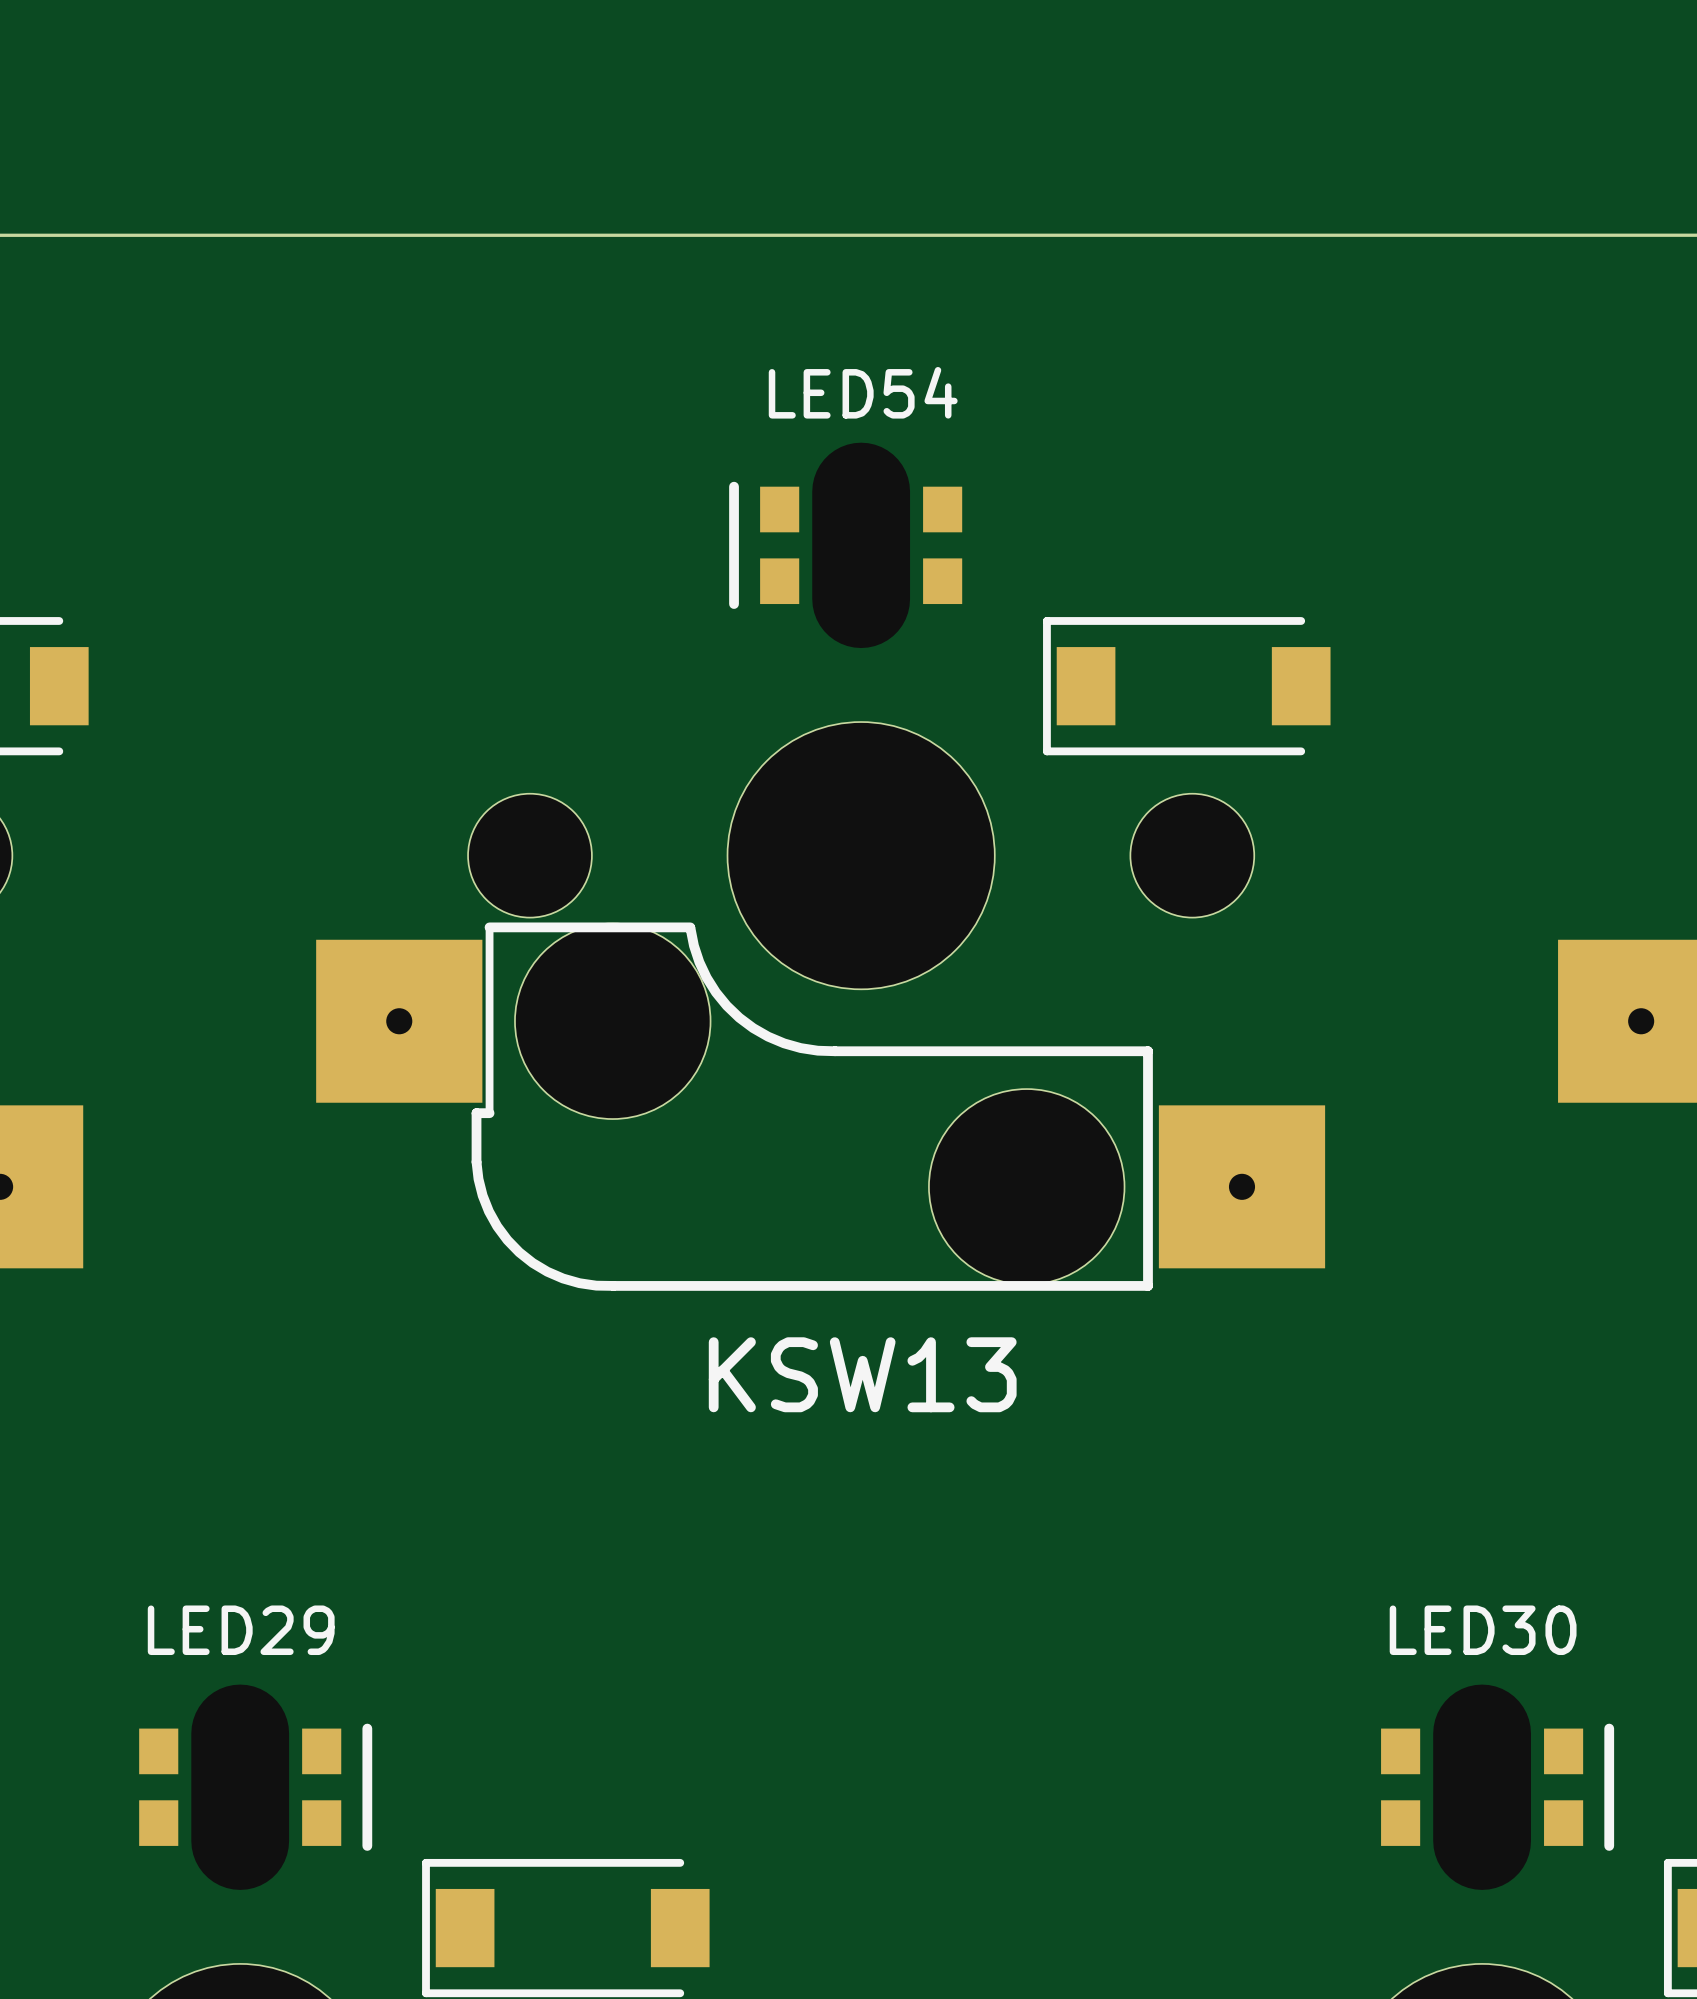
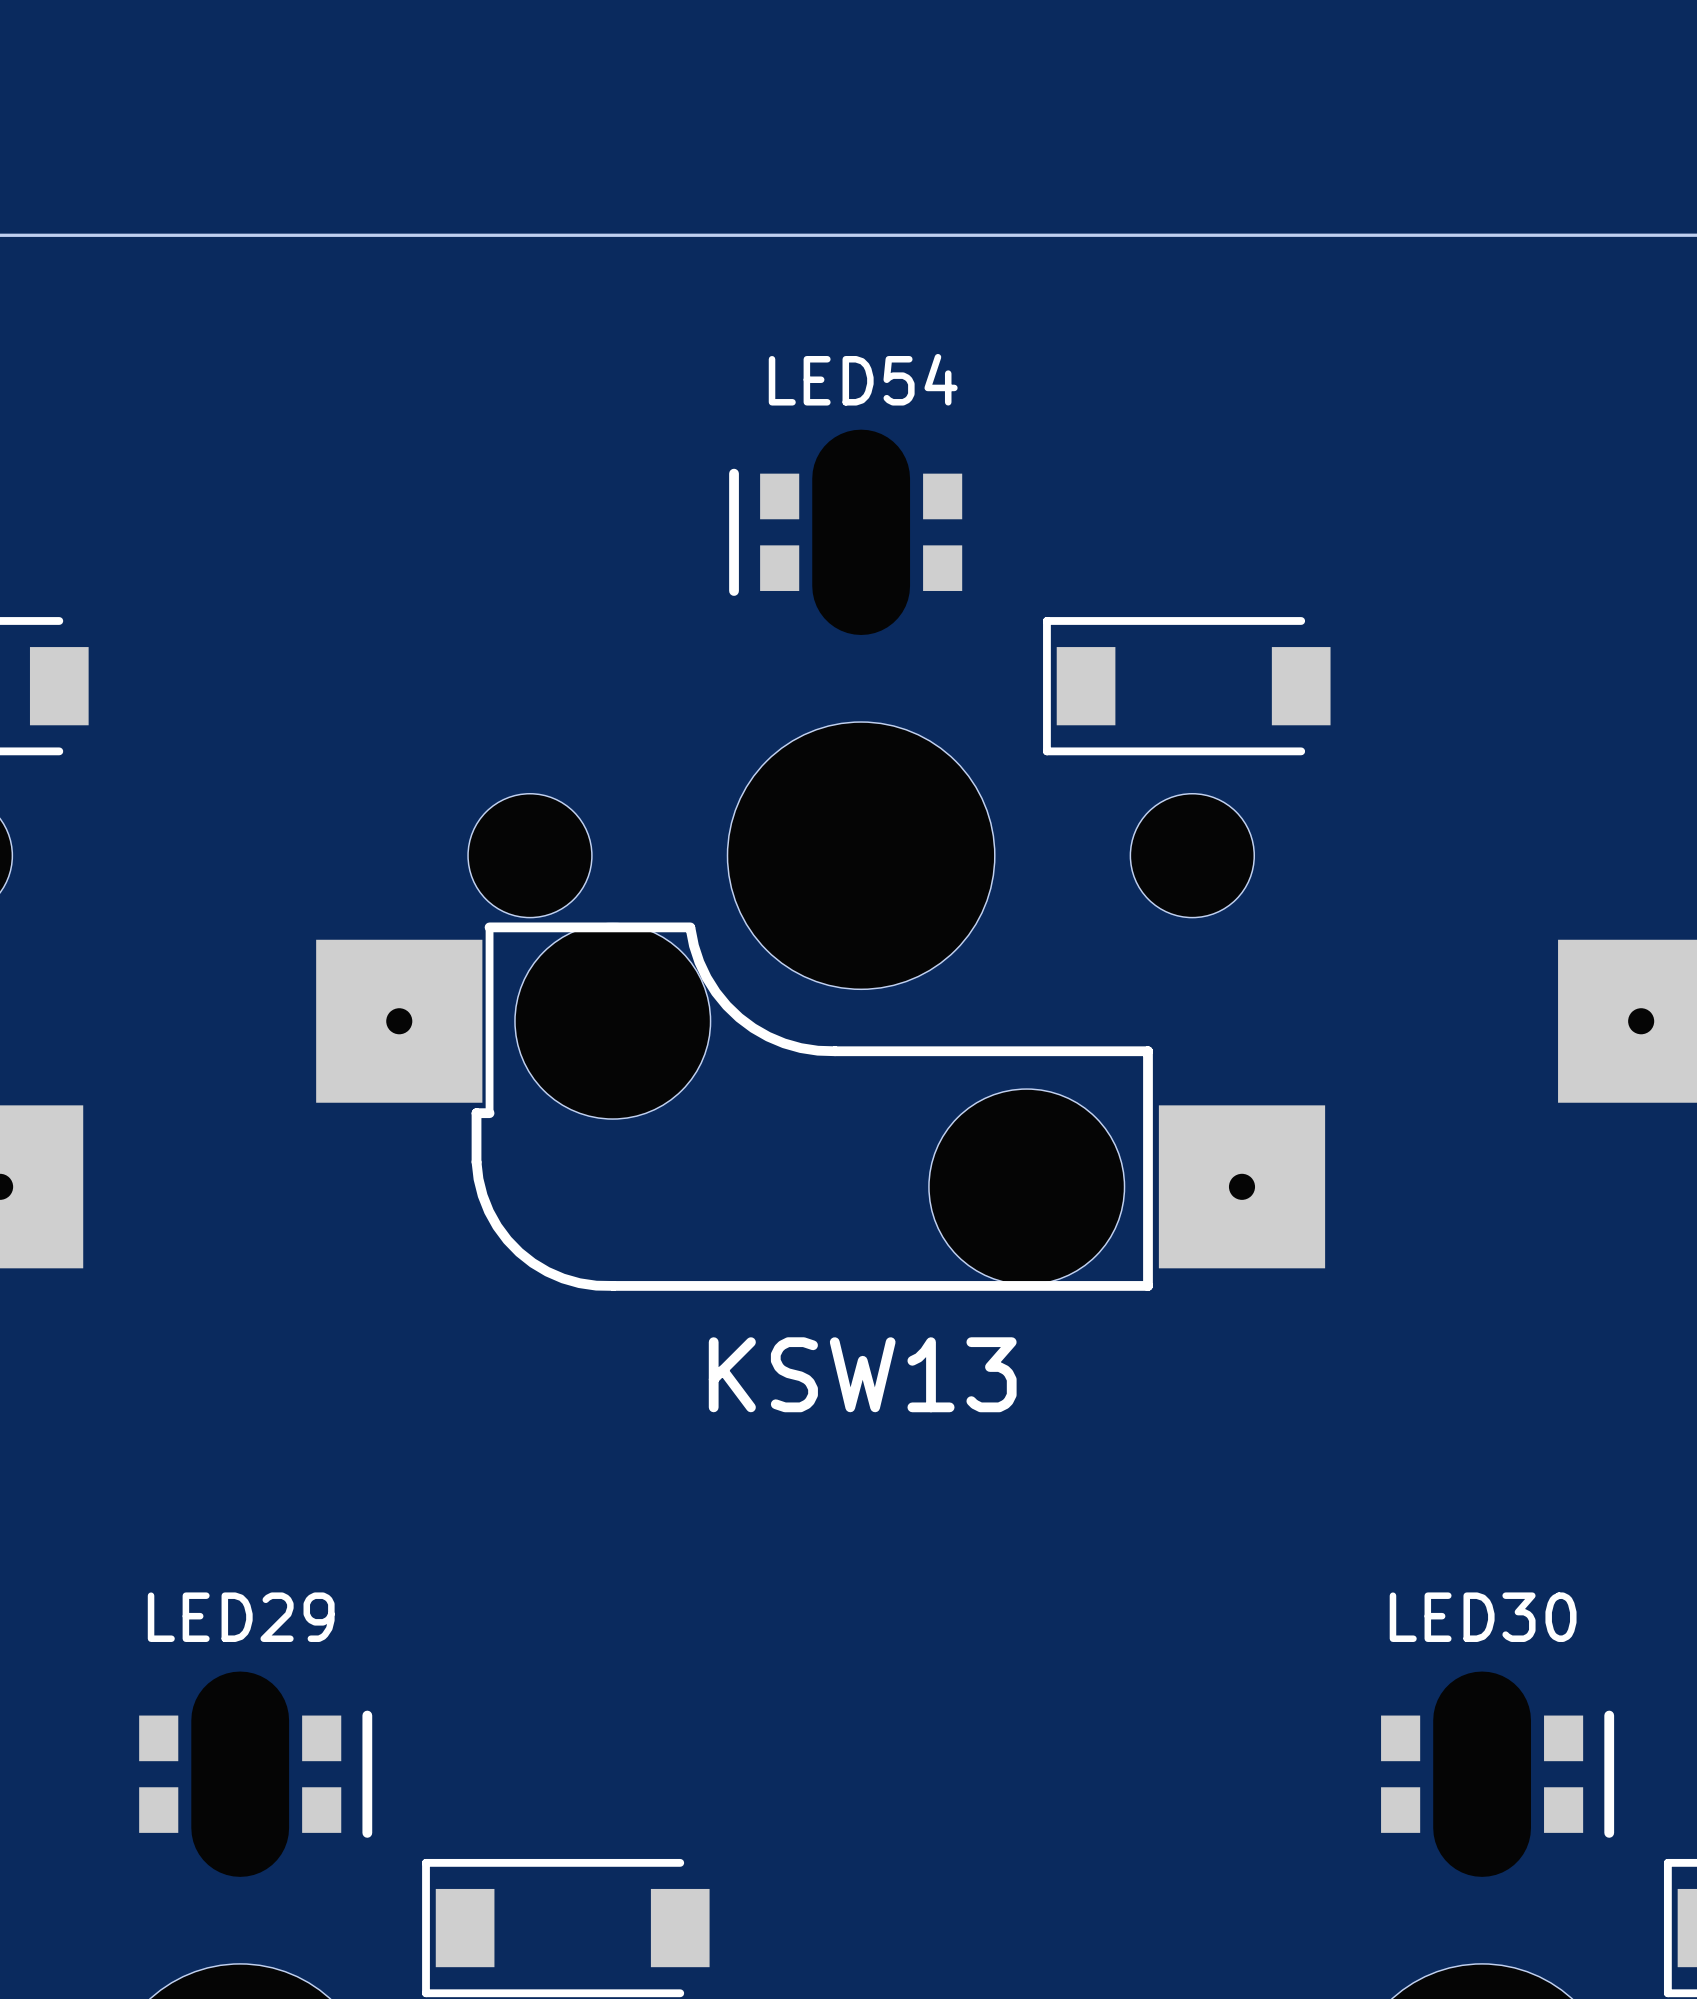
LED54 position: (845, 545) -> (845, 532)
LED29 position: (255, 1787) -> (255, 1774)
LED30 position: (1497, 1787) -> (1497, 1774)

